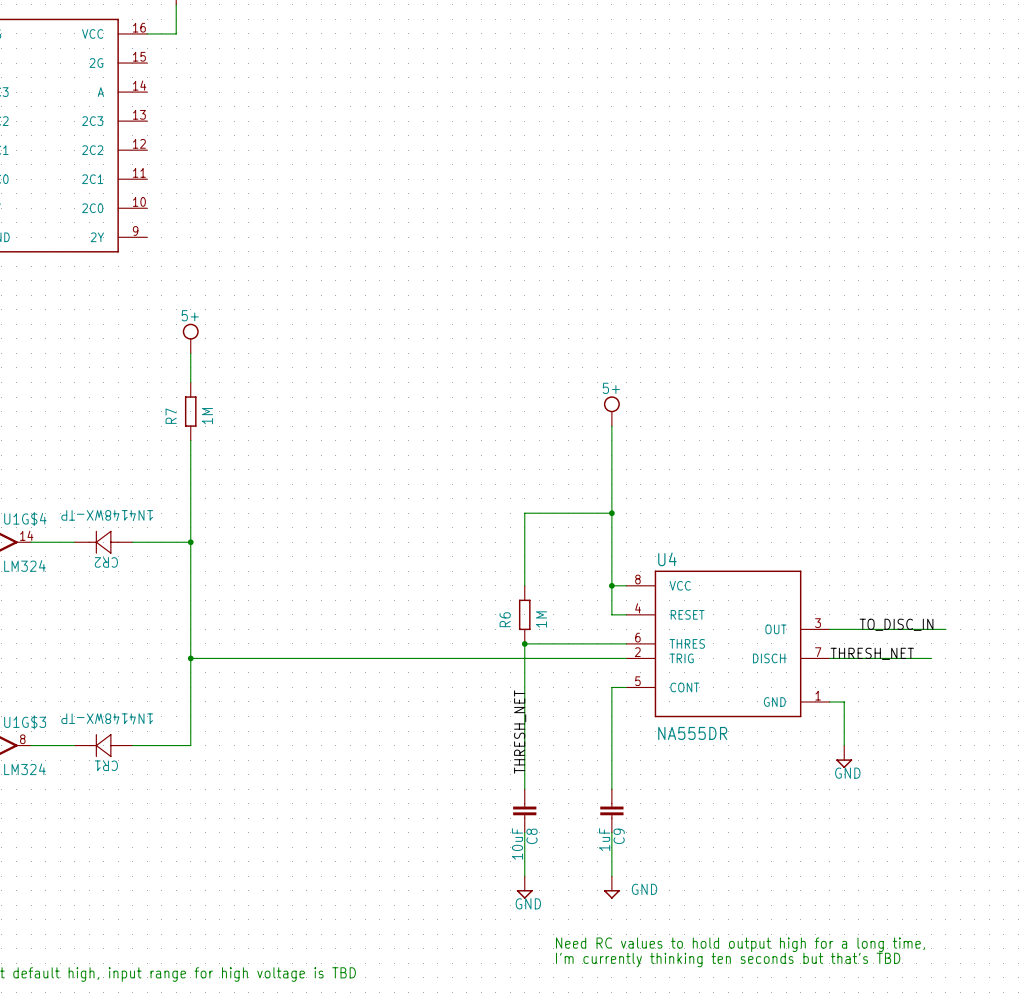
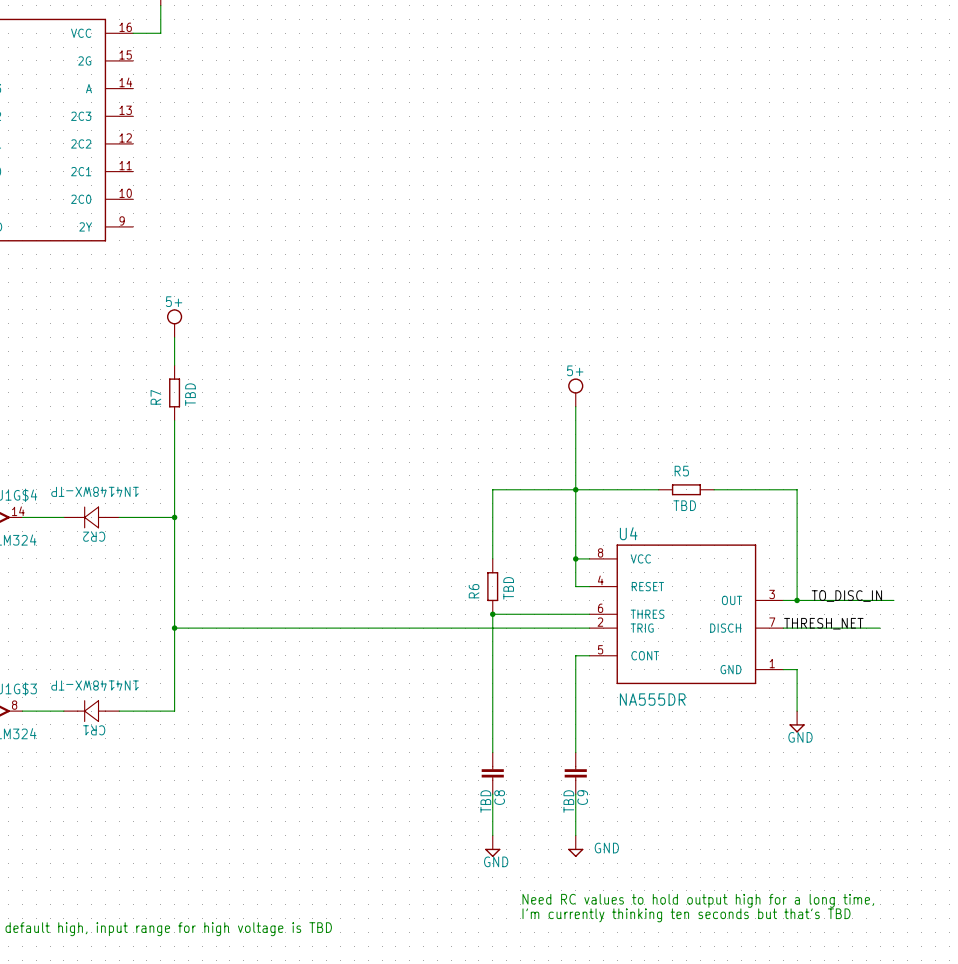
R7 value: 1M (207, 416) -> TBD (190, 394)
wire: none -> (575, 489) (658, 489)
R5: none -> TBD (686, 489)
wire: none -> (714, 489) (797, 489) (797, 600)
R6 value: 1M (541, 619) -> TBD (508, 588)
junction: none -> (797, 600)
label: THRESH_NET (520, 732) -> none
C9 value: 1uF (604, 839) -> TBD (568, 801)
C8 value: 10uF (517, 843) -> TBD (485, 801)

